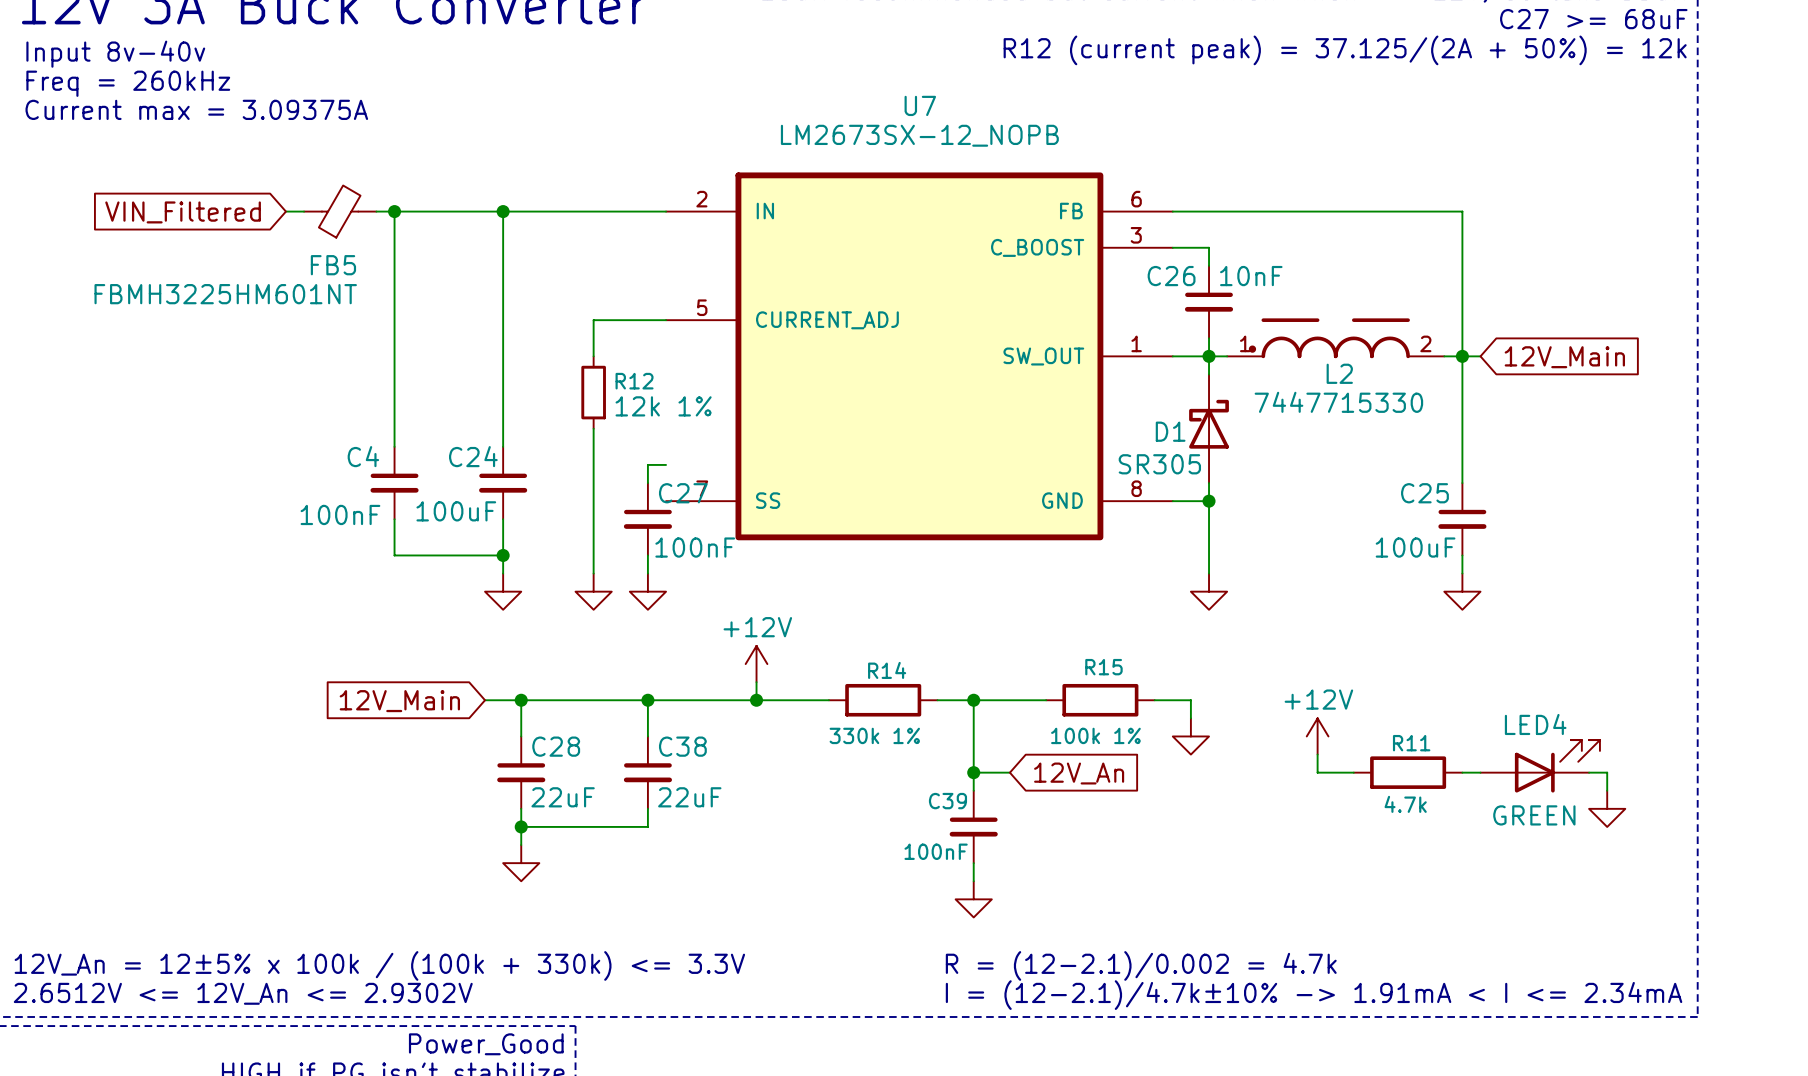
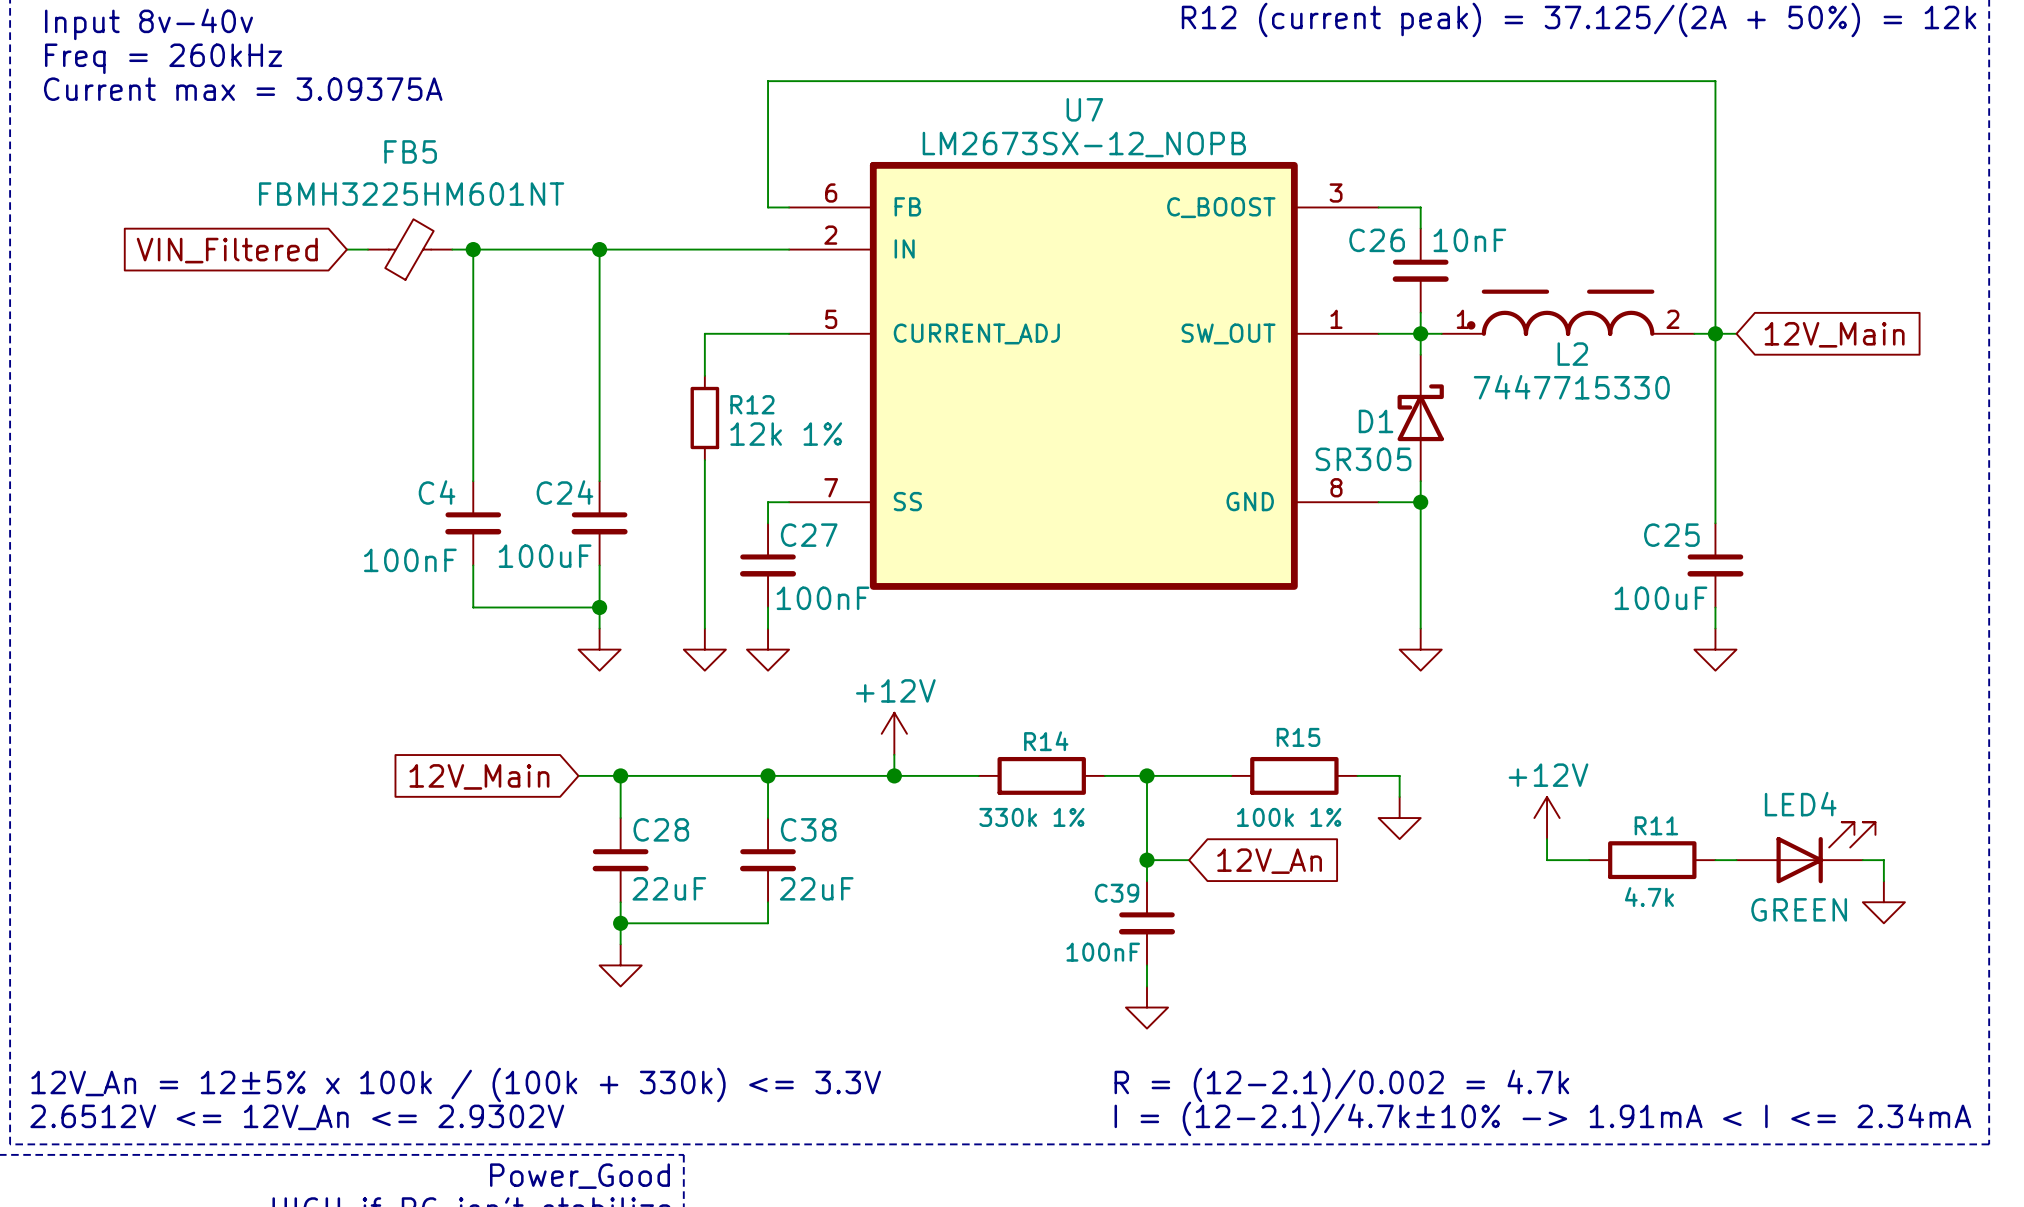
U7 symbol: [666, 172, 1173, 541] -> [789, 161, 1379, 590]
wire: (285, 211) (304, 211) -> (346, 249) (368, 249)
FB5 position: (340, 211) -> (410, 249)
wire: (376, 211) (647, 211) -> (1715, 207) (1715, 81) (768, 81) (768, 207)
wire: (394, 211) (394, 247) -> none
junction position: (394, 211) -> (473, 249)
wire: (503, 211) (503, 247) -> none
junction position: (503, 211) -> (599, 249)
wire: (1209, 211) (1462, 211) -> (1420, 207) (1420, 228)
global label position: VIN_Filtered (183, 212) -> VIN_Filtered (227, 250)
wire: none -> (452, 249) (789, 249)
wire: (1172, 247) (1209, 247) (1209, 265) -> none
FB5 name position: FB5 (333, 265) -> FB5 (410, 151)
FB5 value position: FBMH3225HM601NT (225, 294) -> FBMH3225HM601NT (411, 194)
C26 position: (1209, 302) -> (1420, 270)
L2 position: (1335, 338) -> (1568, 312)
wire: (1172, 356) (1227, 356) -> (1378, 333) (1441, 333)
junction position: (1209, 356) -> (1420, 333)
wire: (1444, 356) (1480, 356) -> (1694, 333) (1736, 333)
junction position: (1462, 356) -> (1715, 333)
global label position: 12V_Main (1564, 357) -> 12V_Main (1834, 334)
D1 position: (1209, 428) -> (1420, 418)
wire: (1172, 501) (1209, 501) -> (1378, 502) (1420, 502)
junction position: (1209, 501) -> (1420, 502)

